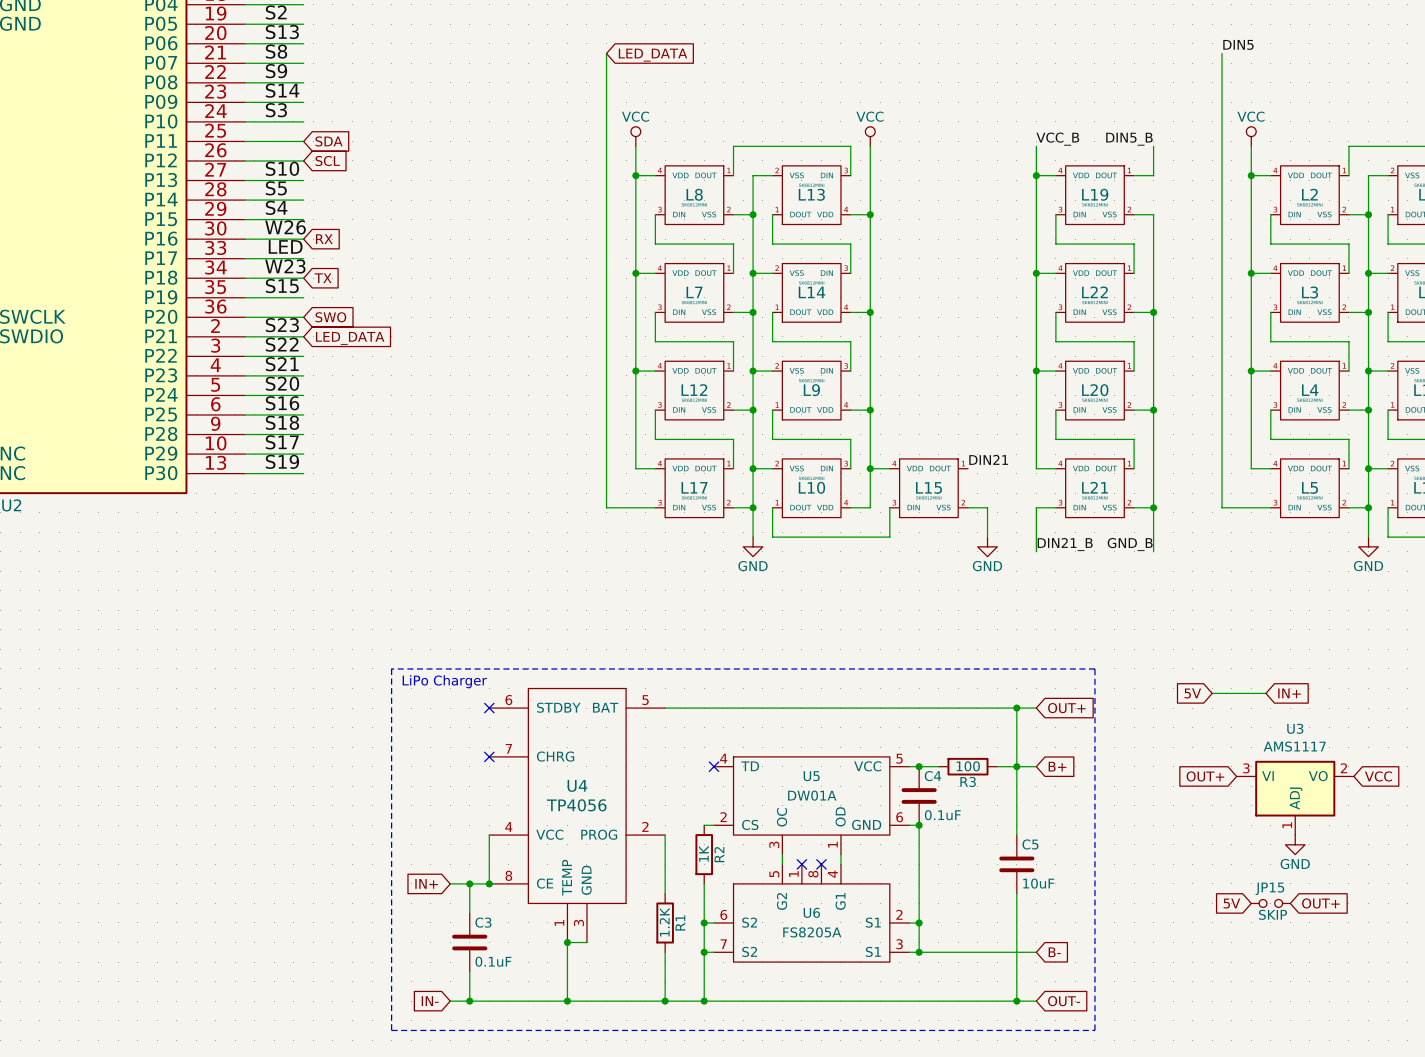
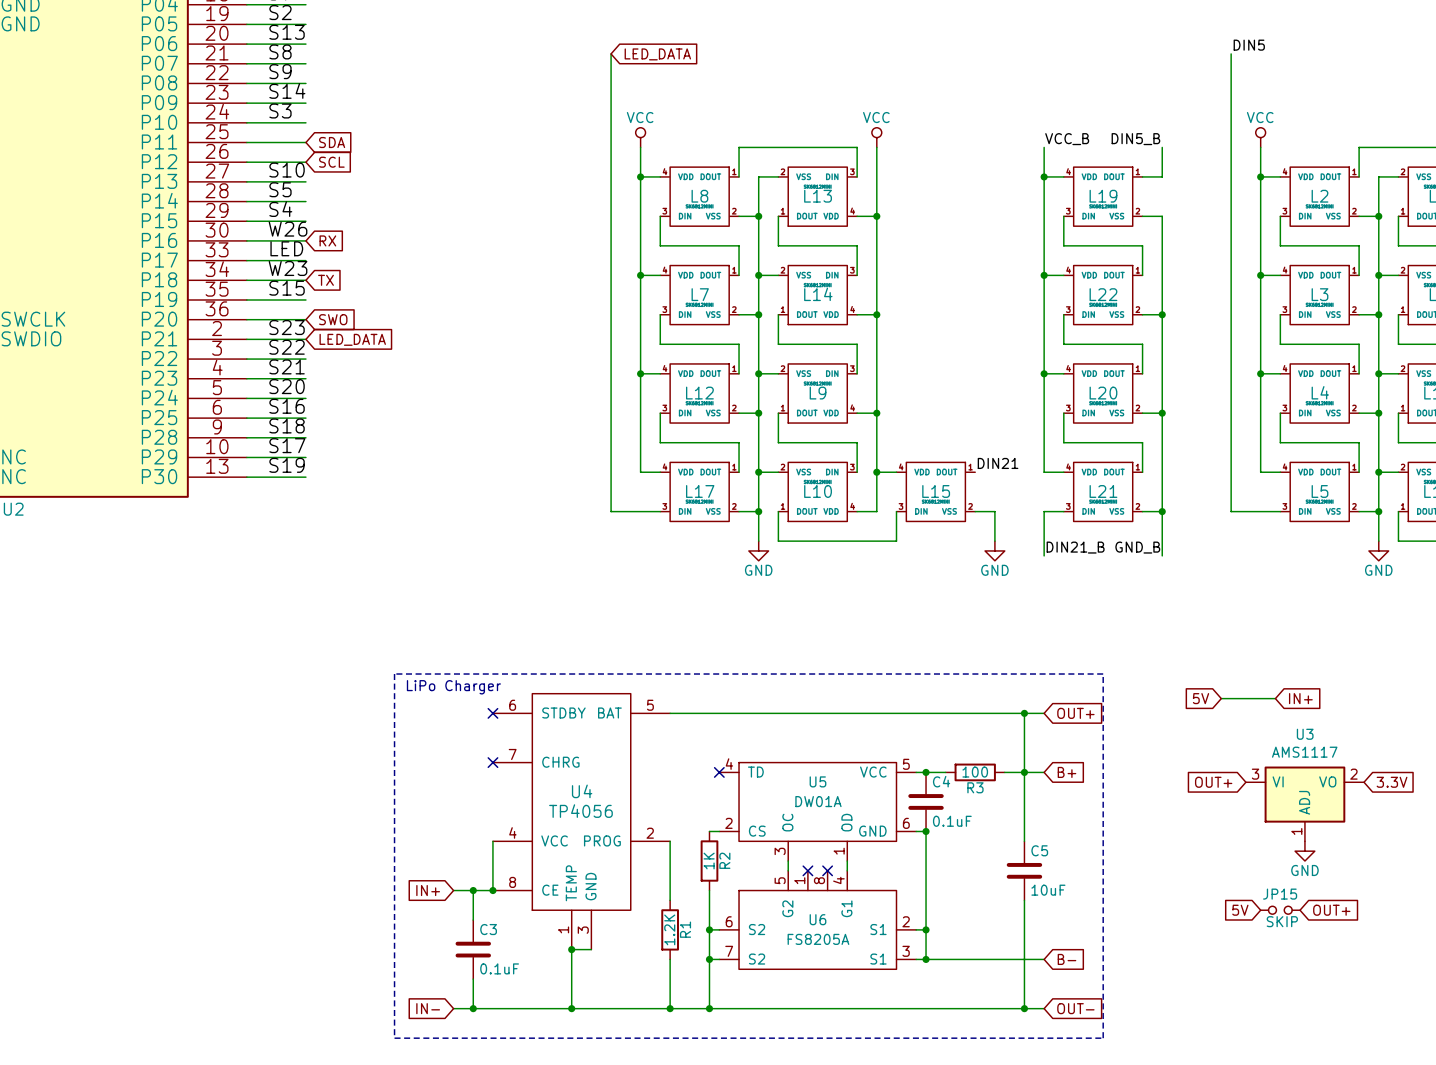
global label: VCC (1378, 776) -> 3.3V (1392, 782)

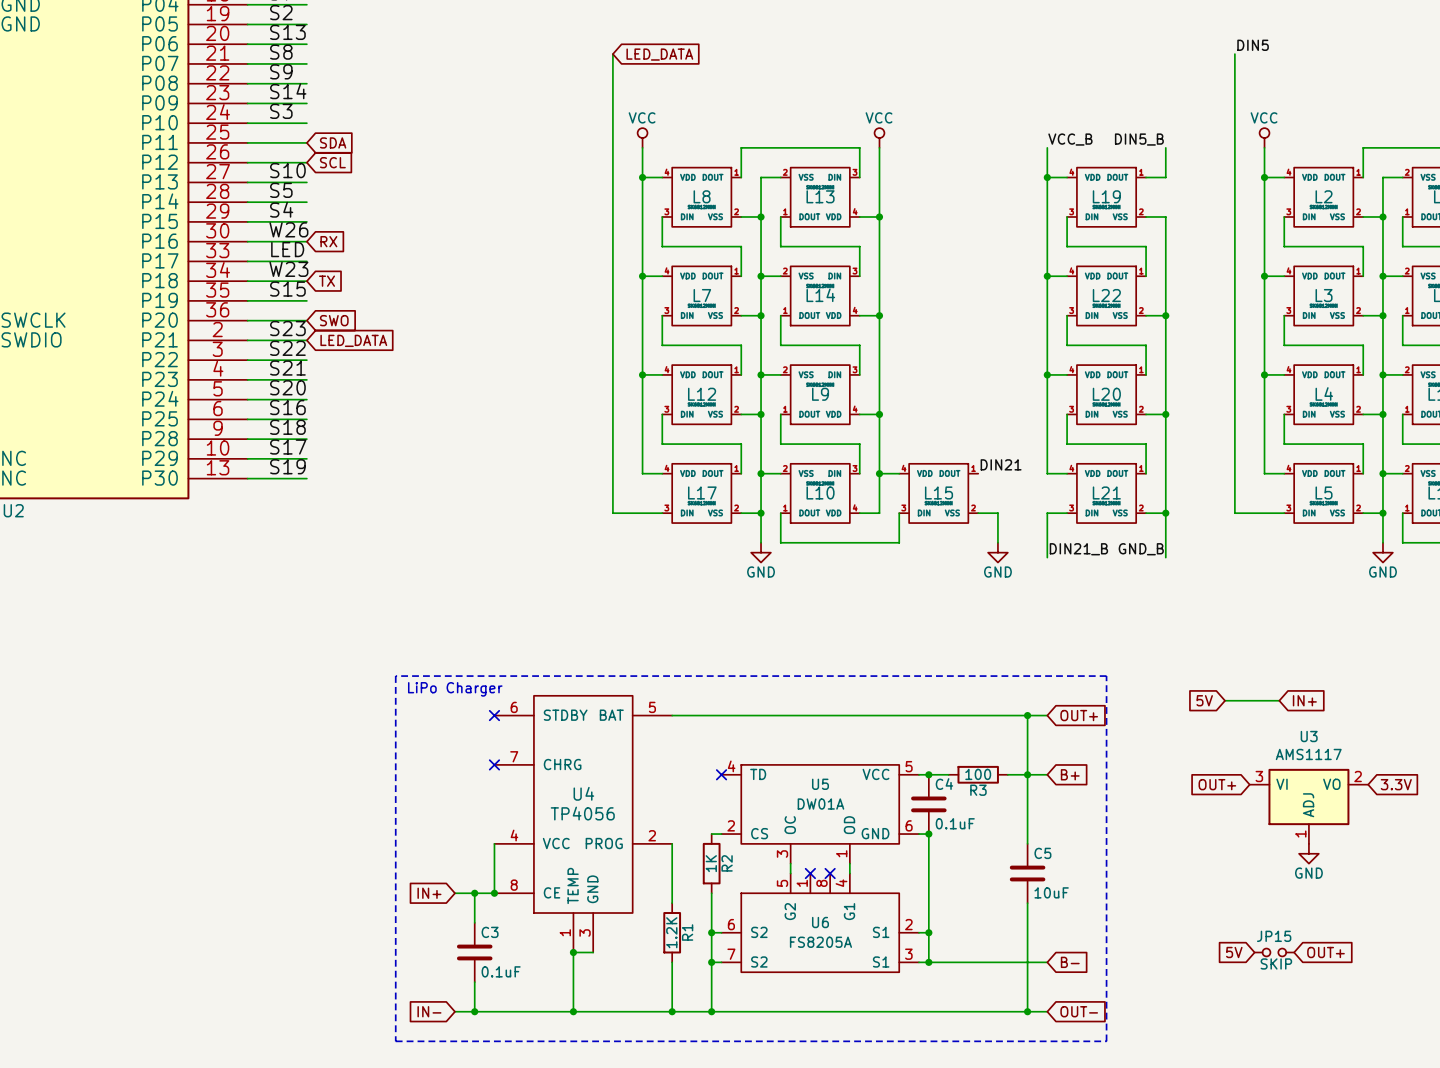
global label position: 5V (1240, 910) -> 5V (1234, 952)
JP15 position: (1280, 910) -> (1274, 952)
global label position: OUT+ (1331, 910) -> OUT+ (1326, 952)

